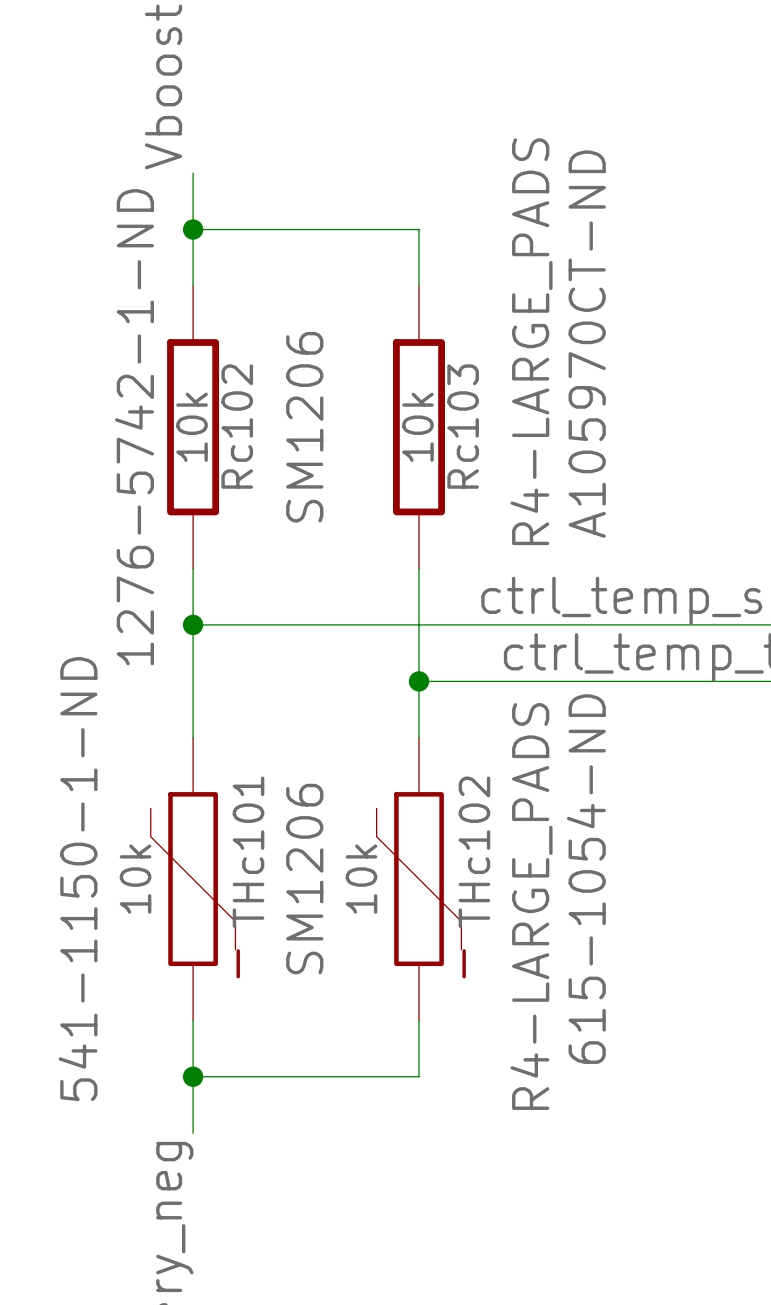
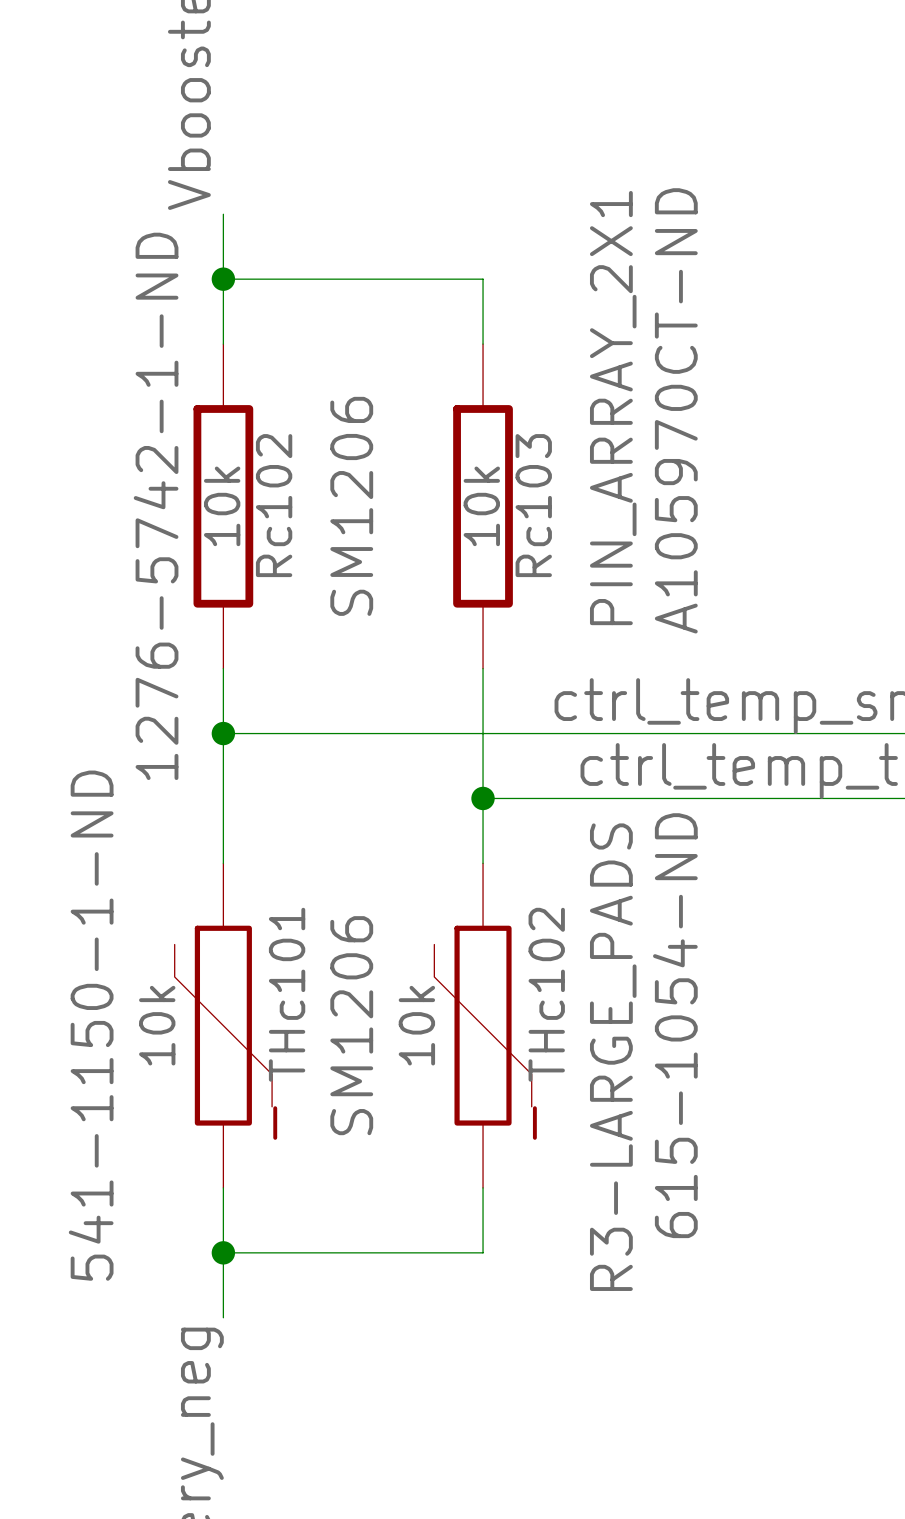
Rc103 text: R4-LARGE_PADS (531, 341) -> PIN_ARRAY_2X1 (613, 408)
THc102 text: R4-LARGE_PADS (531, 906) -> R3-LARGE_PADS (613, 1057)

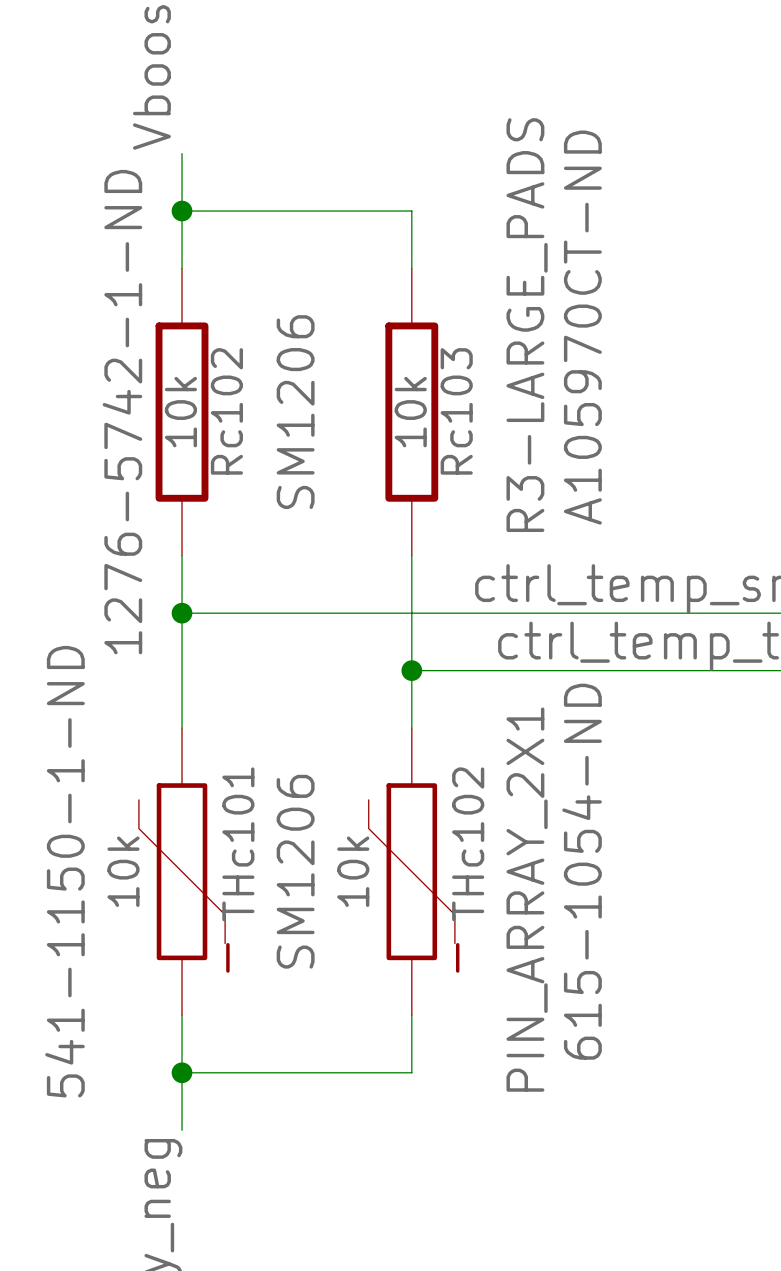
Rc103 text: PIN_ARRAY_2X1 (613, 408) -> R3-LARGE_PADS (527, 325)
THc102 text: R3-LARGE_PADS (613, 1057) -> PIN_ARRAY_2X1 (527, 899)

